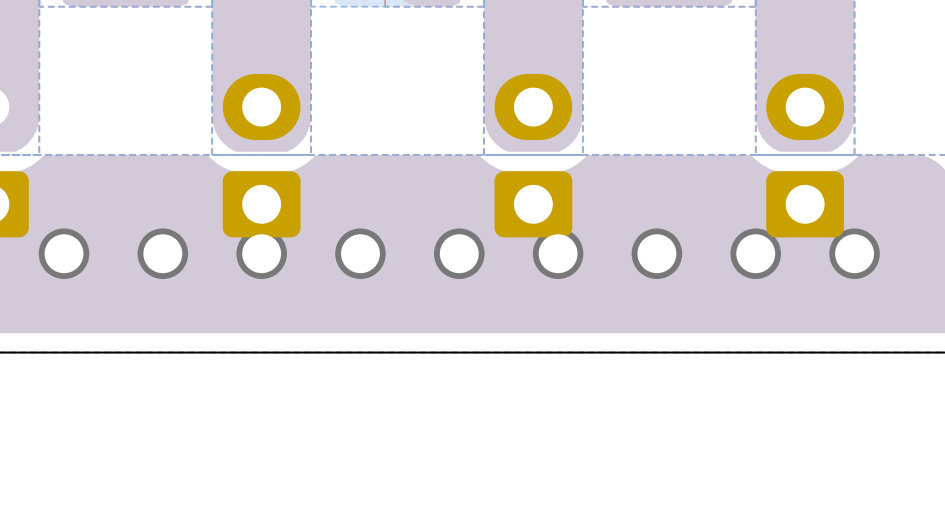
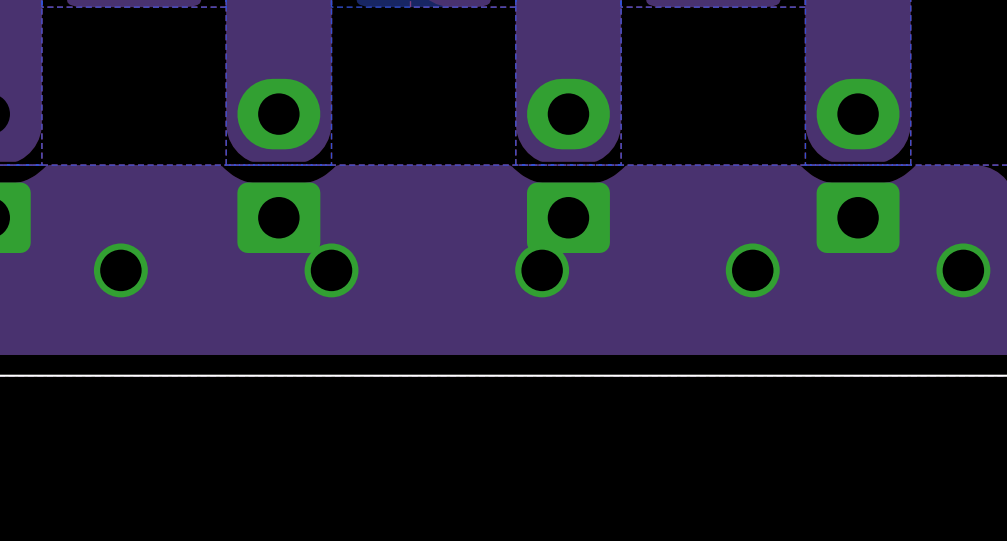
via: (64, 253) -> none
via: none -> (120, 270)
via: (162, 253) -> none
via: (261, 253) -> none
via: none -> (331, 270)
via: (360, 253) -> none
via: (459, 253) -> none
via: none -> (542, 270)
via: (558, 253) -> none
via: (656, 253) -> none
via: none -> (752, 270)
via: (755, 253) -> none
via position: (854, 253) -> (963, 270)

